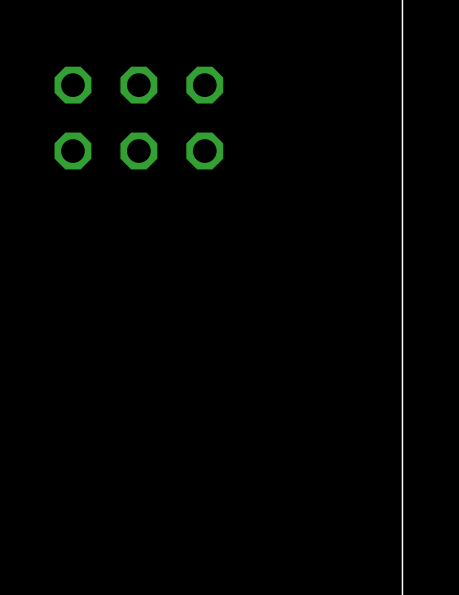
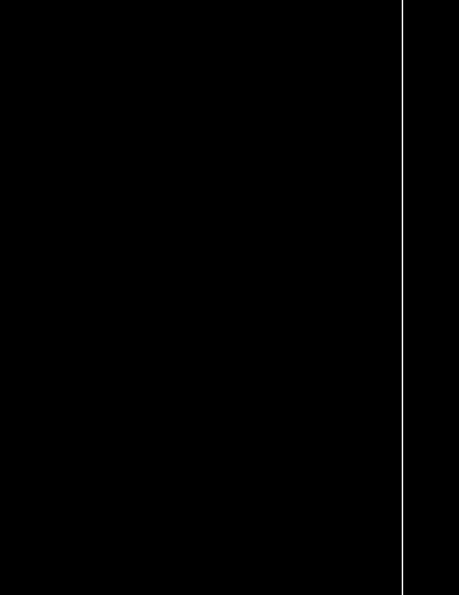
part: (138, 118) -> none

